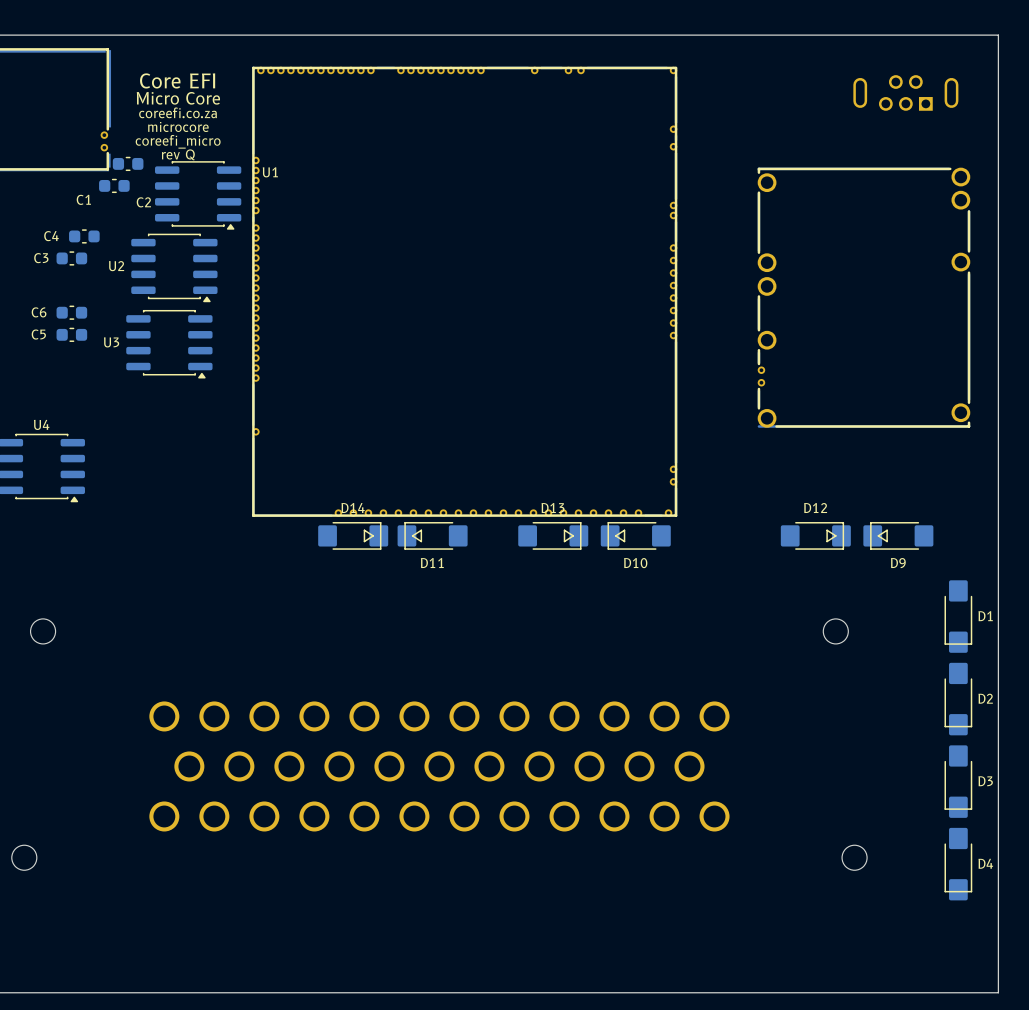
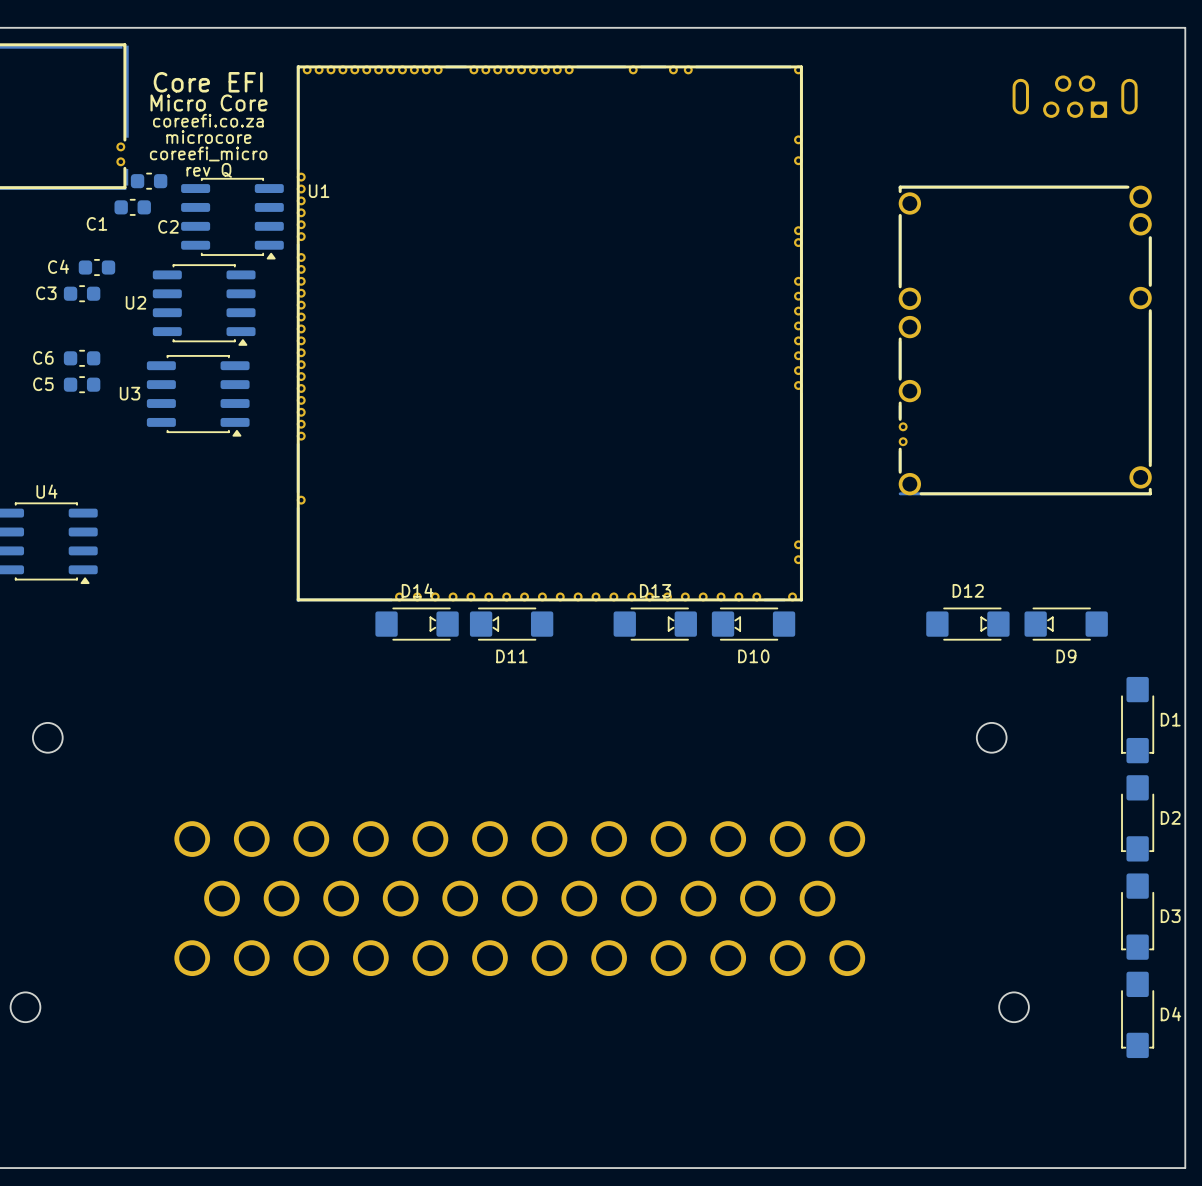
D14 footprint: [318, 522, 389, 550] -> [375, 607, 459, 641]
D11 footprint: [397, 522, 468, 550] -> [469, 607, 554, 641]
D13 footprint: [518, 522, 589, 550] -> [613, 607, 697, 641]
D10 footprint: [600, 522, 671, 550] -> [711, 607, 796, 641]
D12 footprint: [780, 522, 851, 550] -> [926, 607, 1010, 641]
D9 footprint: [863, 522, 934, 550] -> [1024, 607, 1108, 641]
D1 footprint: [944, 580, 973, 653] -> [1121, 676, 1155, 764]
D2 footprint: [944, 662, 973, 736] -> [1121, 775, 1155, 862]
D3 footprint: [944, 745, 973, 818] -> [1121, 873, 1155, 960]
D4 footprint: [944, 827, 973, 901] -> [1121, 971, 1155, 1059]

